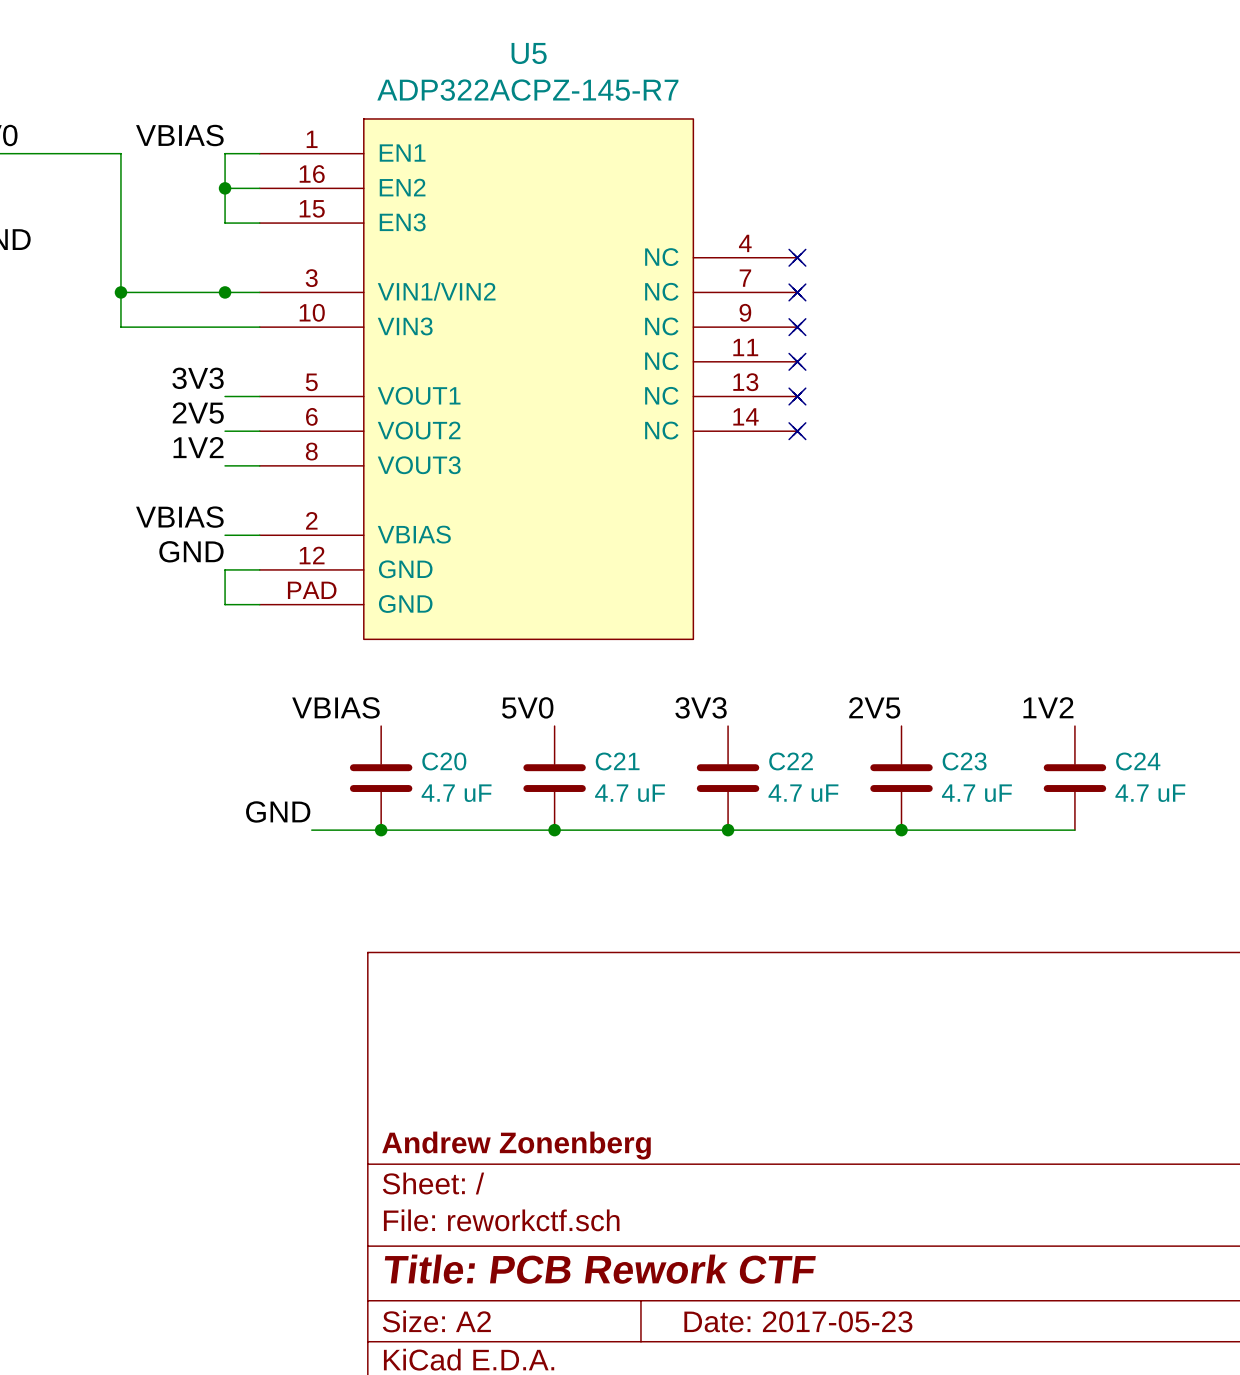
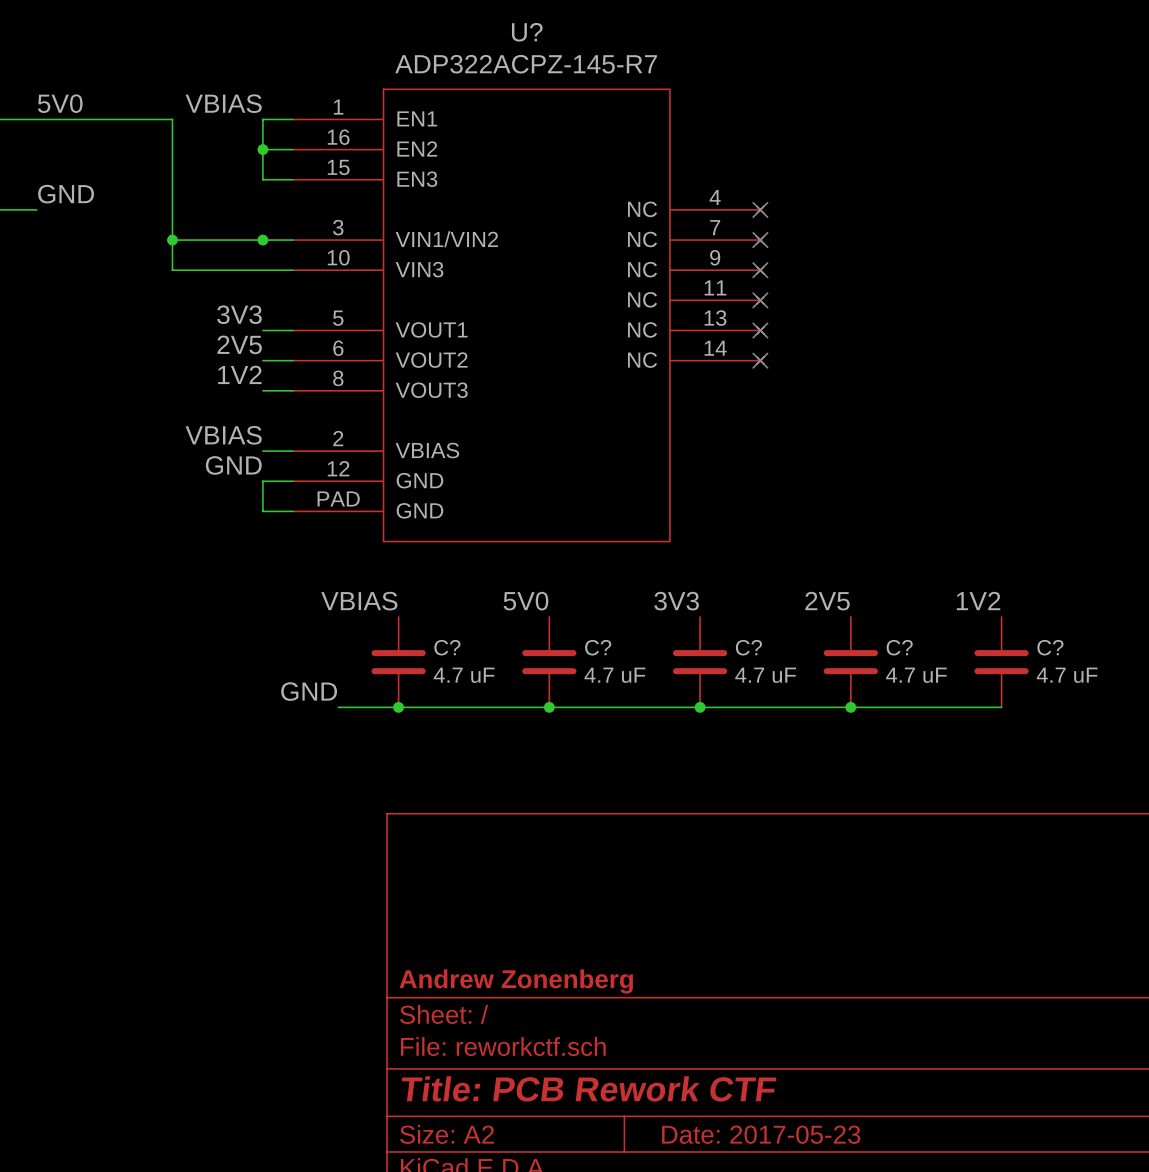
U5 name: U5 (529, 53) -> U? (527, 32)
C20 name: C20 (444, 761) -> C? (447, 647)
C21 name: C21 (617, 761) -> C? (598, 647)
C22 name: C22 (791, 761) -> C? (748, 647)
C23 name: C23 (964, 761) -> C? (899, 647)
C24 name: C24 (1138, 761) -> C? (1050, 647)

